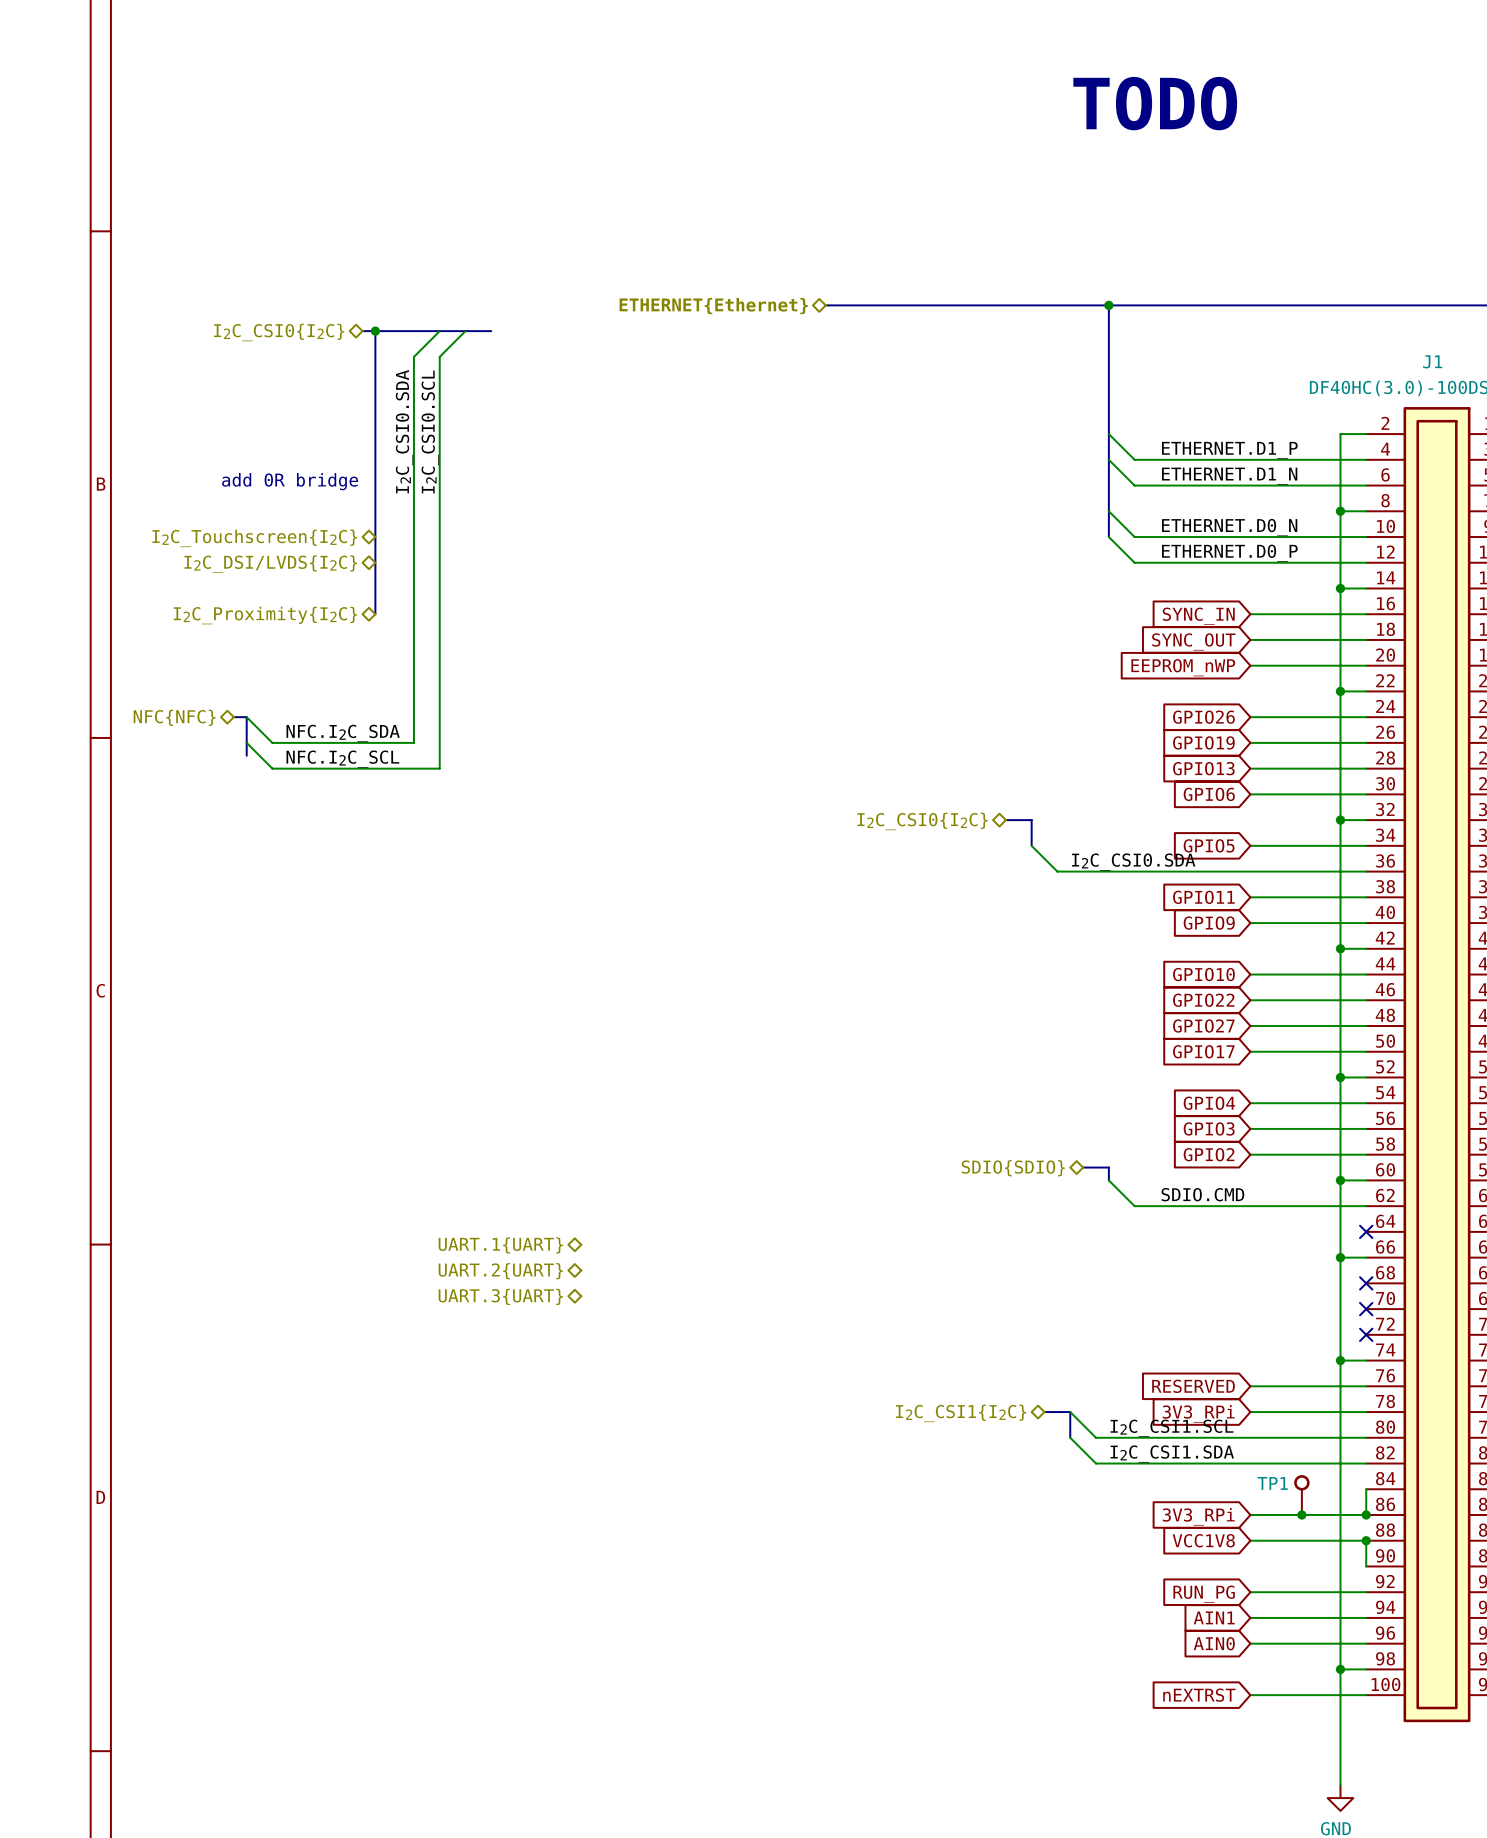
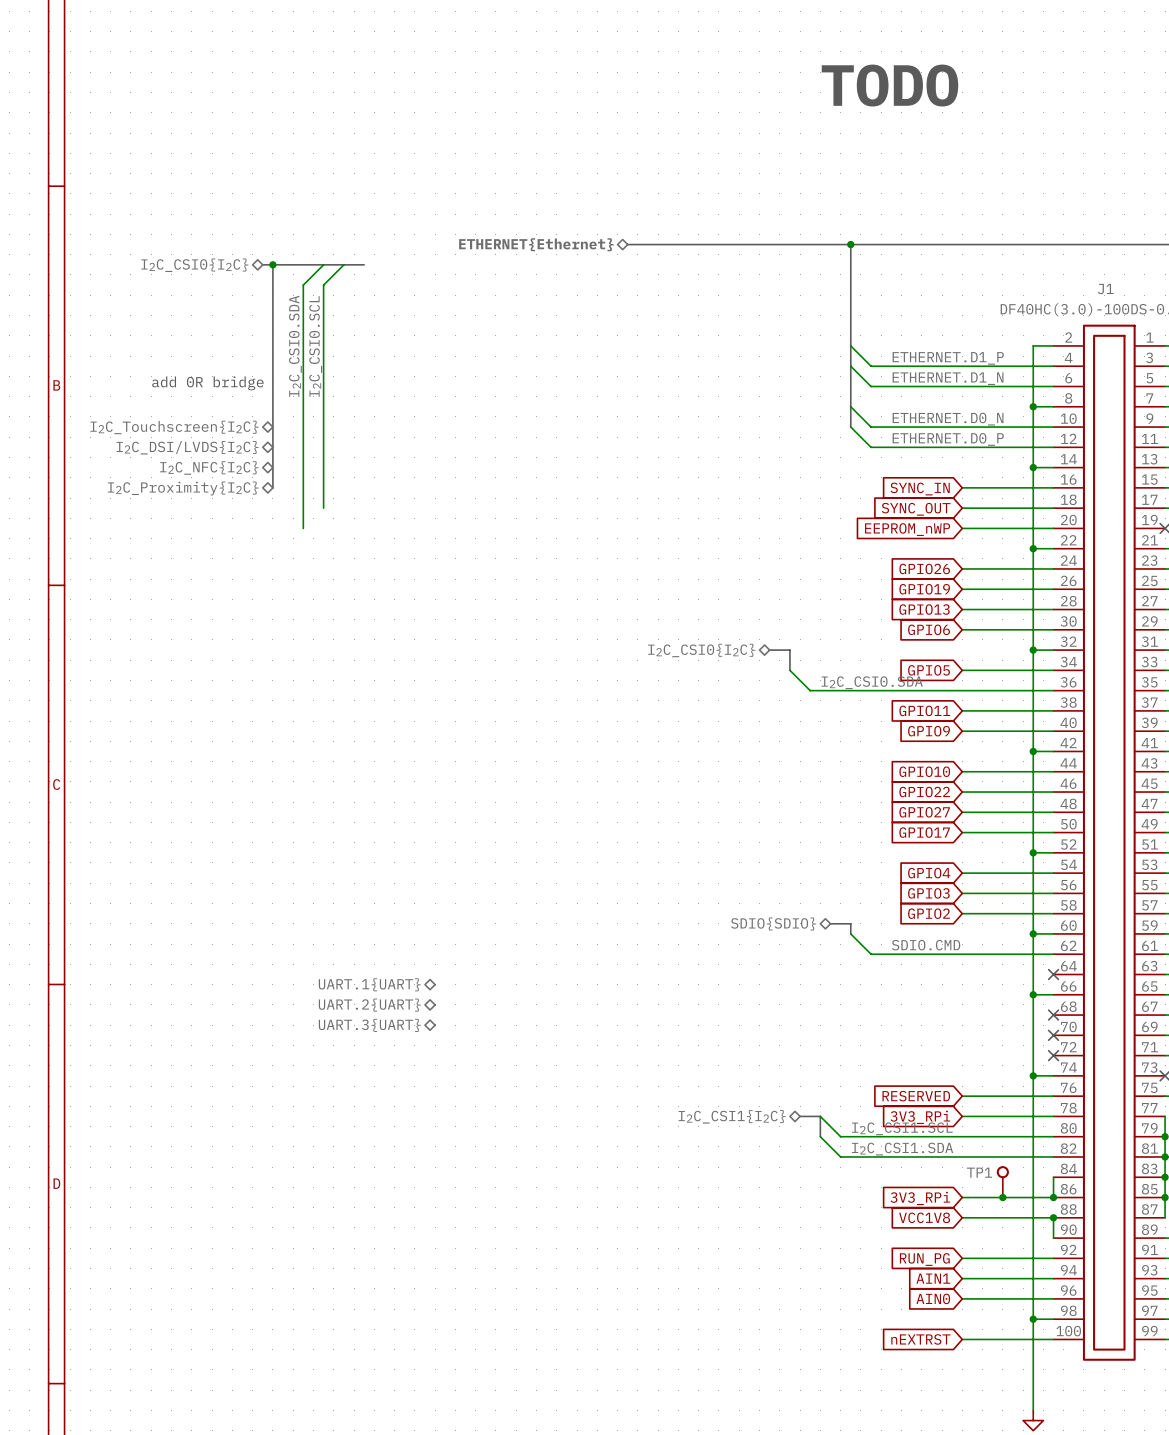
hierarchical label: none -> I2C_NFC{I2C} (209, 468)
wire: (439, 639) (439, 768) (272, 768) (246, 742) -> none
wire: (413, 665) (413, 742) (272, 742) (246, 717) -> none
hierarchical label: NFC{NFC} (174, 717) -> none
bus: (233, 717) (246, 717) (246, 755) -> none
label: NFC.I2C_SDA (343, 733) -> none
label: NFC.I2C_SCL (342, 759) -> none

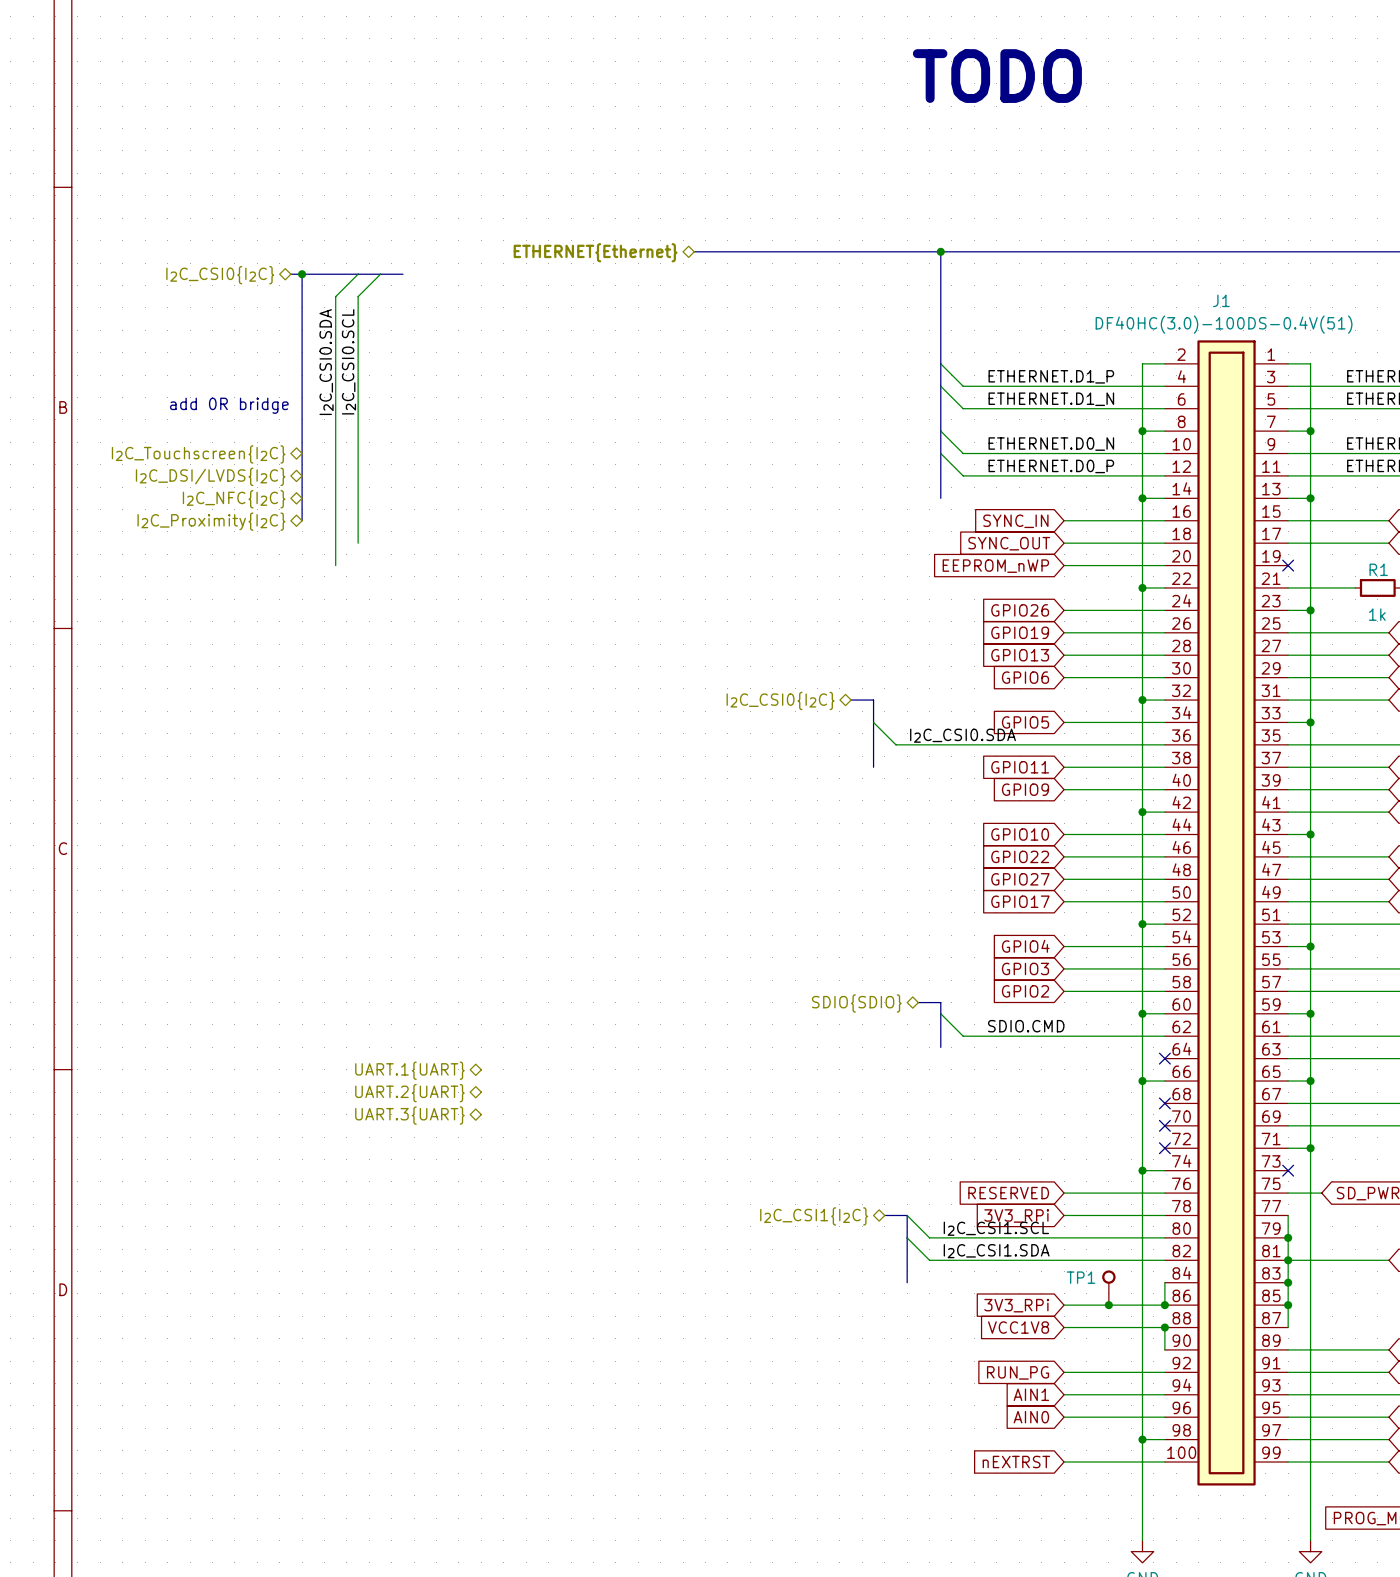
bus: none -> (940, 453) (940, 498)
bus: none -> (873, 722) (873, 767)
bus: none -> (940, 1013) (940, 1047)
bus: none -> (907, 1237) (907, 1282)

